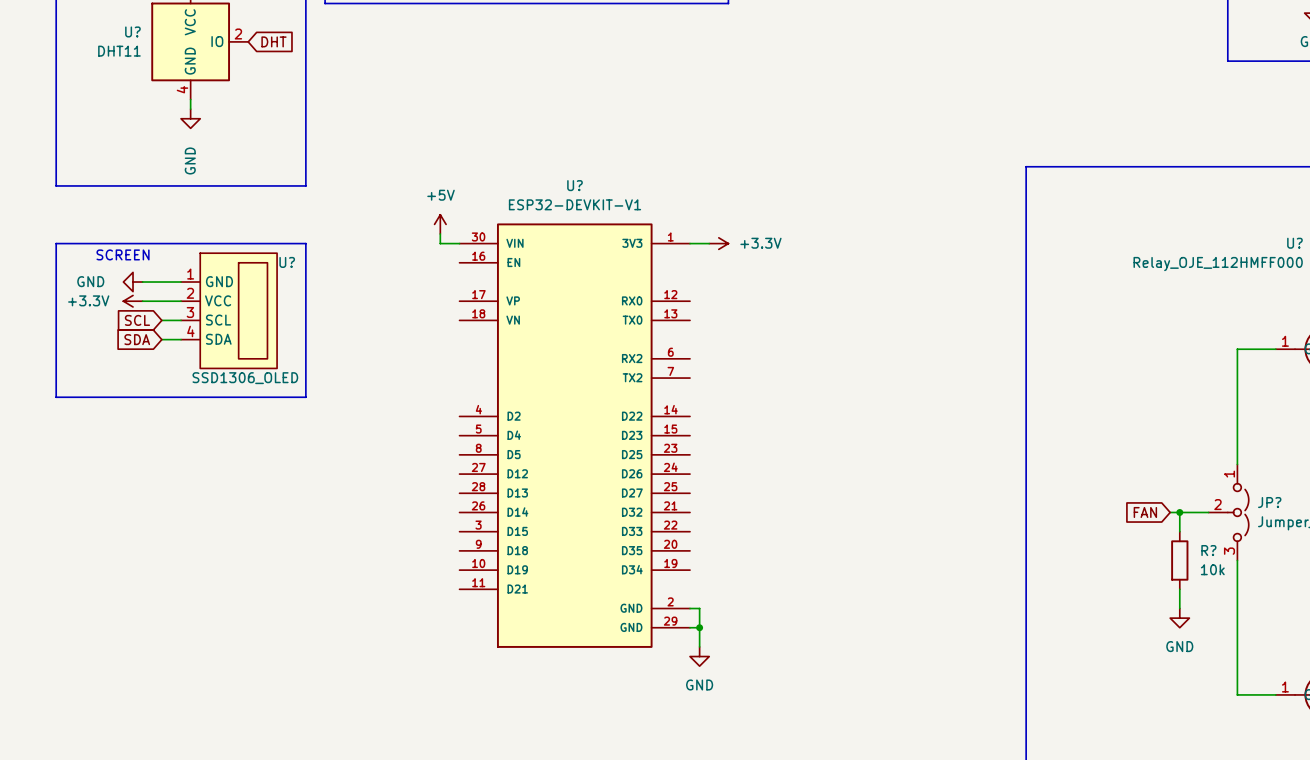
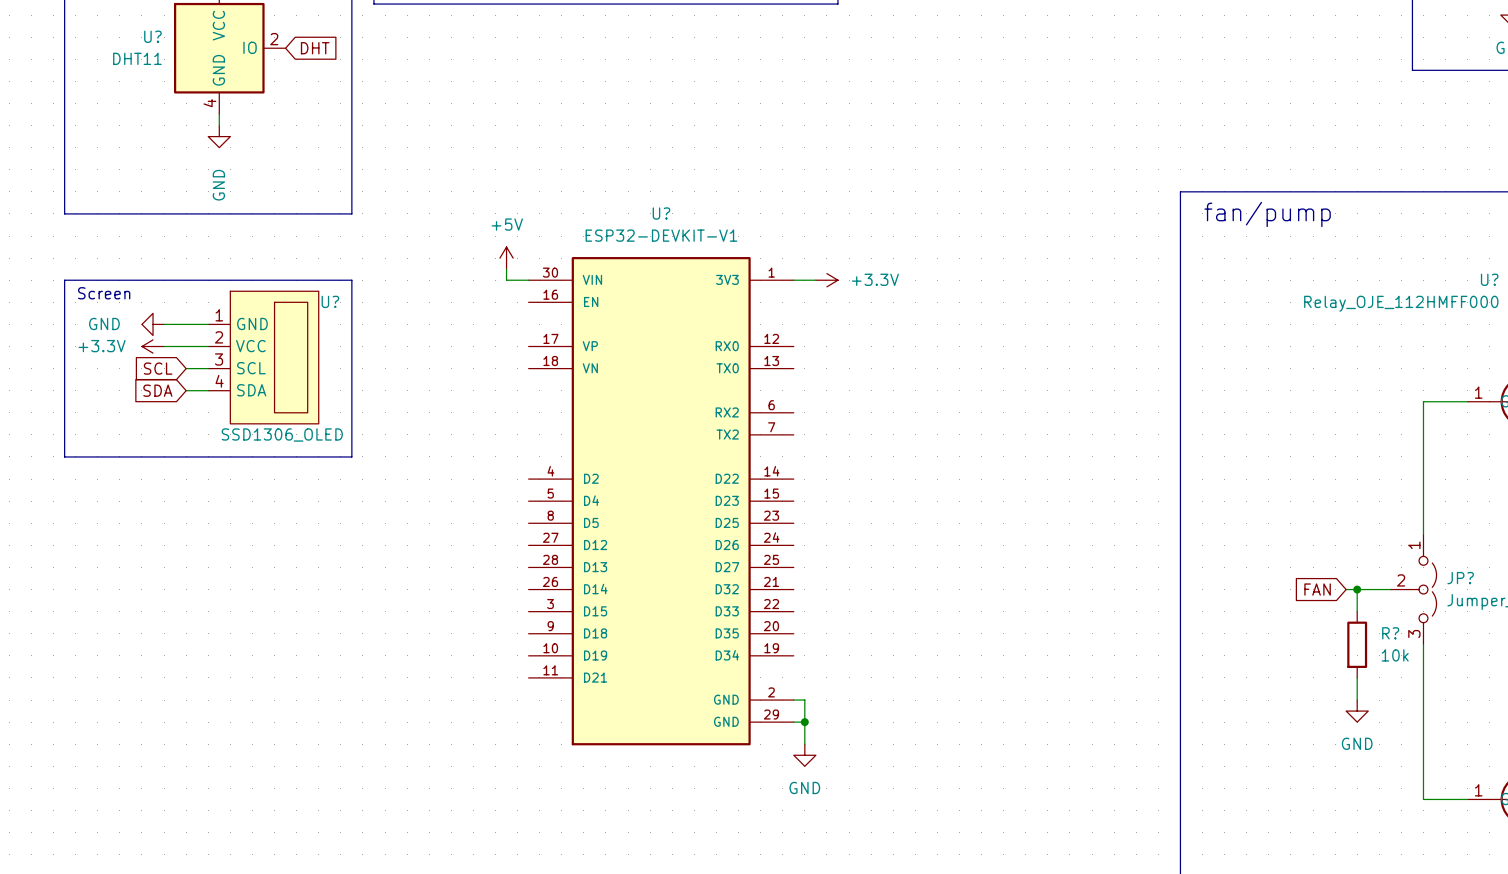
text: none -> fan/pump (1267, 214)
text: none -> Screen (104, 293)
text: SCREEN (123, 254) -> none

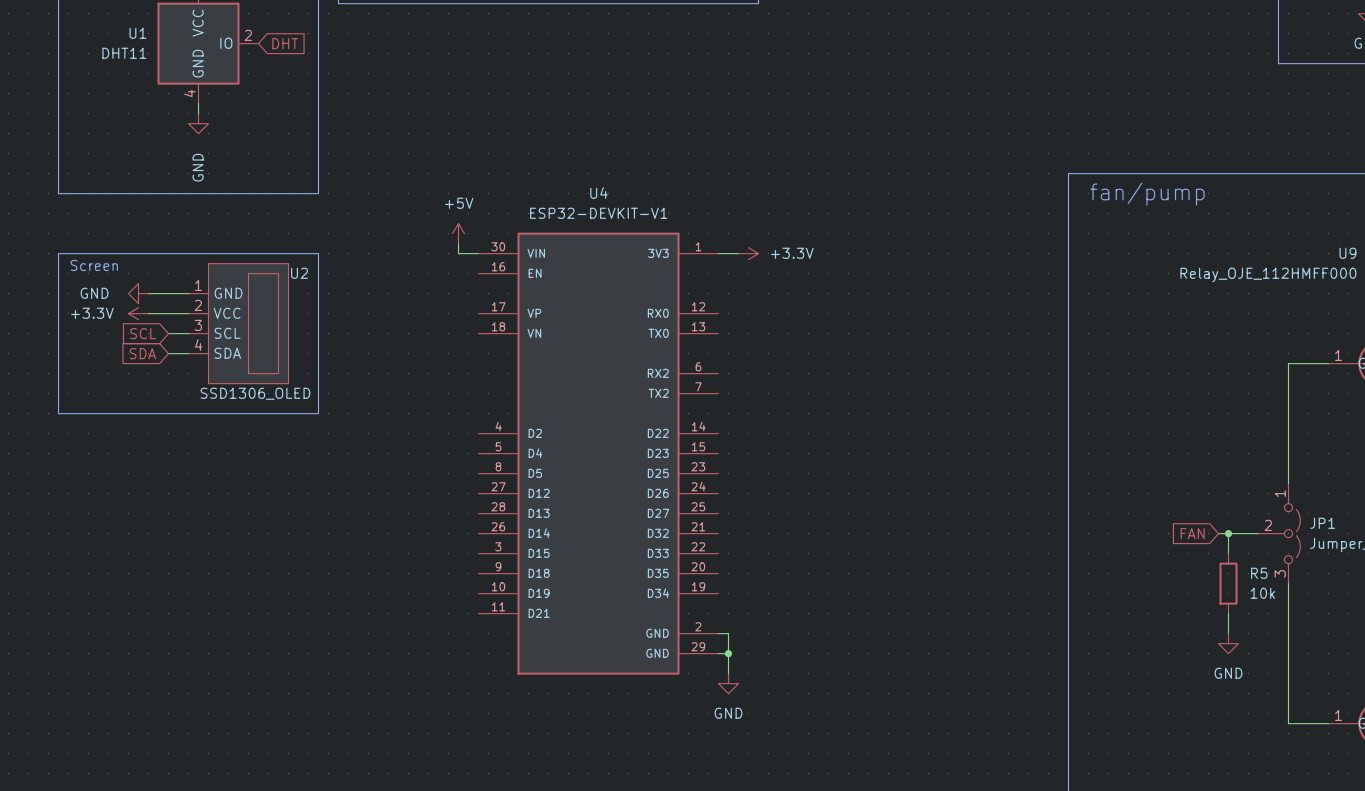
U? name: U? (152, 36) -> U1 (137, 33)
U? name: U? (661, 213) -> U4 (598, 193)
U? name: U? (1489, 279) -> U9 (1347, 253)
U? name: U? (330, 301) -> U2 (299, 273)
JP? name: JP? (1460, 578) -> JP1 (1322, 523)
R? name: R? (1390, 633) -> R5 (1259, 573)

